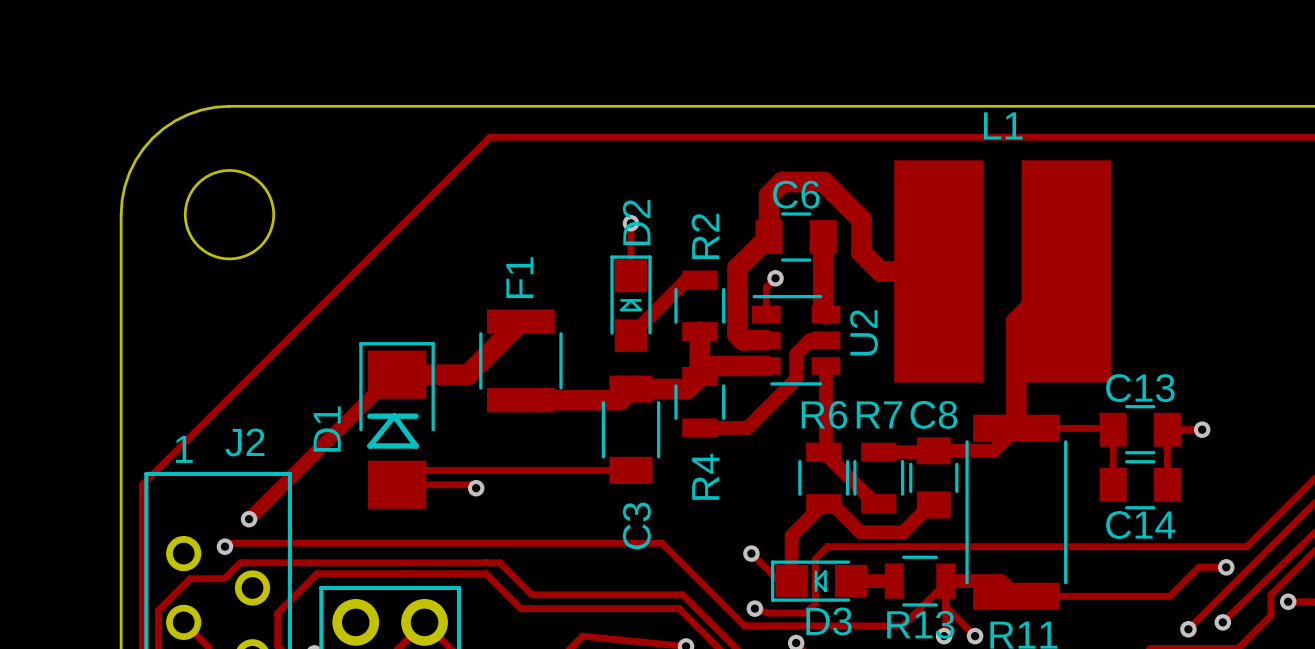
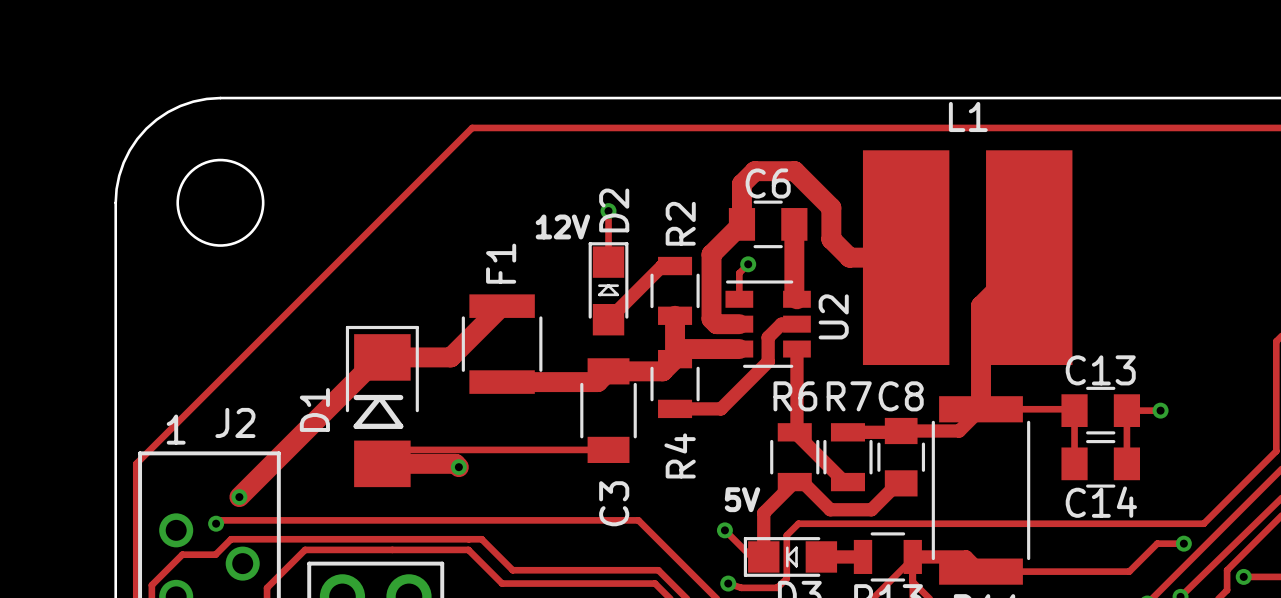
text: none -> 12V (562, 226)
track width: thin (397, 374) (393, 374) (249, 519) -> thick (382, 357) (379, 357) (239, 497)
track width: thin (397, 484) (472, 484) (476, 488) -> thick (382, 463) (455, 463) (458, 467)
text: none -> 5V (742, 499)

